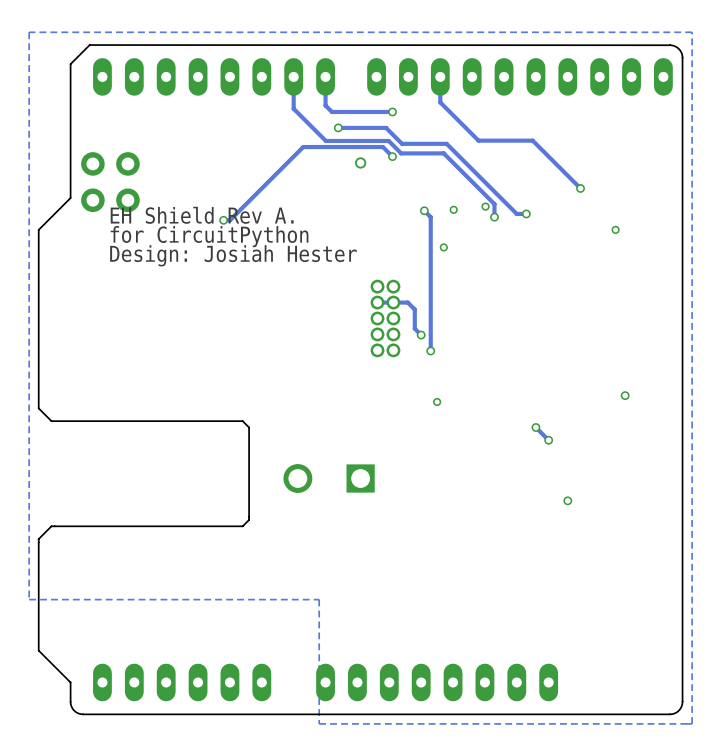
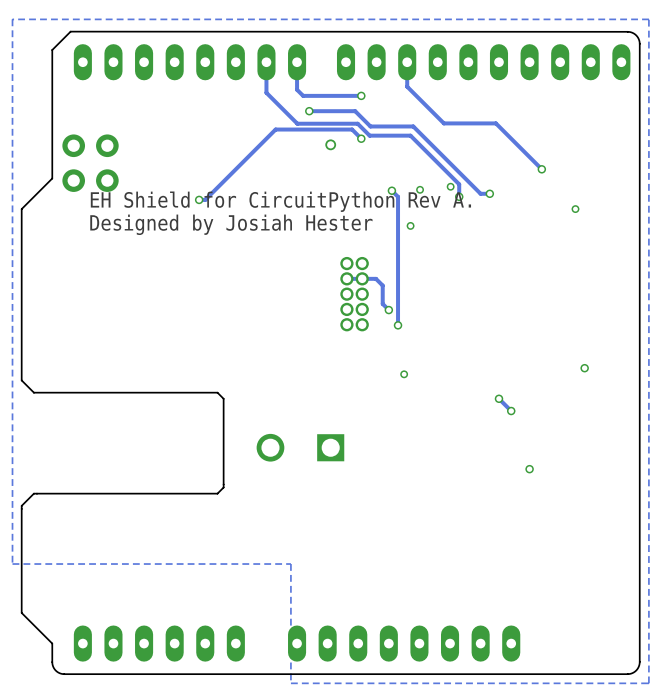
text: EH Shield Rev A. (202, 215) -> EH Shield for CircuitPython Rev A. (280, 201)
text: for CircuitPython (209, 236) -> none
text: Design: Josiah Hester (233, 255) -> Designed by Josiah Hester (231, 224)

